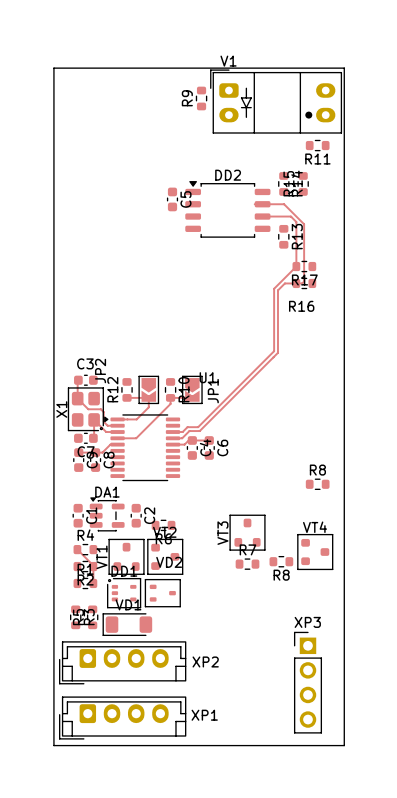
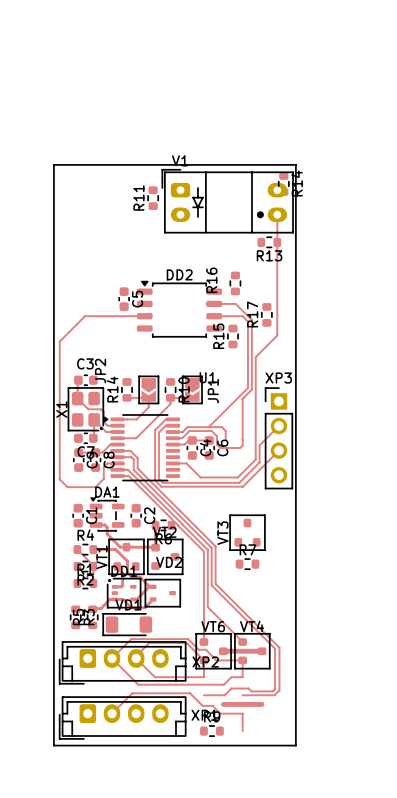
R9 rotation: 0° (201, 98) -> 90° clockwise (211, 731)
R9 position: (201, 98) -> (211, 731)
V1 position: (276, 101) -> (227, 201)
R11 rotation: 0° (317, 145) -> 90° clockwise (153, 198)
R11 position: (317, 145) -> (153, 198)
board edge: (53, 164) (53, 68) (344, 68) (344, 745) (295, 745) -> (53, 164) (295, 164) (295, 745)
R15 position: (303, 183) -> (232, 336)
C5 position: (172, 199) -> (124, 299)
track: (254, 204) (284, 204) (304, 224) (304, 281) (302, 283) (284, 283) (277, 290) (277, 352) (199, 431) -> (206, 303) (235, 303) (251, 320) (251, 389) (242, 398) (242, 445) (240, 447) (220, 447) (217, 444) (217, 436) (211, 431) (199, 431)
DD2 position: (227, 209) -> (179, 309)
track: none -> (277, 214) (277, 245)
track: (262, 216) (290, 216) (296, 222) (296, 266) (274, 288) (274, 351) (198, 427) -> (225, 440) (225, 431) (221, 427) (198, 427)
R13 rotation: 0° (283, 236) -> 90° clockwise (269, 242)
R13 position: (283, 236) -> (269, 242)
track: none -> (277, 245) (277, 335) (255, 357) (255, 459) (237, 477) (200, 477) (186, 463) (172, 463)
R17 rotation: 0° (304, 266) -> 90° clockwise (266, 314)
R17 position: (304, 266) -> (266, 314)
R16 rotation: 0° (304, 283) -> 90° clockwise (235, 283)
R16 position: (304, 283) -> (235, 283)
track: none -> (144, 316) (85, 316) (59, 341) (59, 479) (67, 487) (95, 487) (103, 478) (103, 466) (107, 463) (117, 463)
track: none -> (214, 316) (242, 316) (247, 321) (247, 387) (208, 427)
R12 name: R12 (112, 389) -> R14 (112, 389)
track: none -> (172, 419) (165, 419) (155, 430) (155, 480) (161, 486) (242, 486) (278, 450)
track: none -> (172, 425) (165, 425) (158, 432) (158, 478) (162, 482) (239, 482) (259, 462) (259, 445) (278, 426)
track: none -> (117, 450) (130, 450) (137, 457) (137, 468) (215, 546) (215, 583) (279, 647) (279, 690) (274, 695) (242, 695)
track: none -> (117, 457) (131, 457) (133, 459) (133, 470) (211, 547) (211, 585) (275, 648) (275, 689) (273, 691) (251, 691) (248, 688) (231, 688) (224, 695) (203, 695)
track: none -> (117, 469) (128, 469) (207, 549) (207, 607) (242, 642)
track: none -> (117, 476) (128, 476) (203, 551) (203, 642)
R8: (317, 484) -> none
track: none -> (96, 524) (104, 524) (107, 527) (107, 534) (120, 547) (155, 547) (155, 530)
track: none -> (93, 549) (115, 549) (127, 561) (127, 572) (132, 577) (140, 577) (149, 586)
VT4 position: (315, 552) -> (252, 651)
R8: (281, 561) -> none
track: none -> (117, 566) (122, 573) (122, 585) (114, 586)
track: none -> (153, 586) (149, 586) (136, 599) (133, 599)
track: none -> (153, 599) (144, 607) (131, 607) (123, 599) (110, 599) (100, 608) (92, 608)
track: none -> (131, 639) (112, 658) (138, 684) (223, 684) (231, 677) (242, 677) (242, 660) (216, 660) (205, 649) (198, 649) (188, 639) (131, 639)
track: none -> (149, 642) (186, 642) (203, 660) (203, 677) (154, 677) (136, 658) (136, 656) (149, 642)
VT6: none -> (213, 651)
track: none -> (223, 651) (262, 651)
XP3 position: (307, 682) -> (278, 438)
track: none -> (223, 704) (262, 704)
track: none -> (112, 713) (132, 693) (190, 693) (202, 705) (212, 705) (220, 713) (242, 713) (242, 731)

